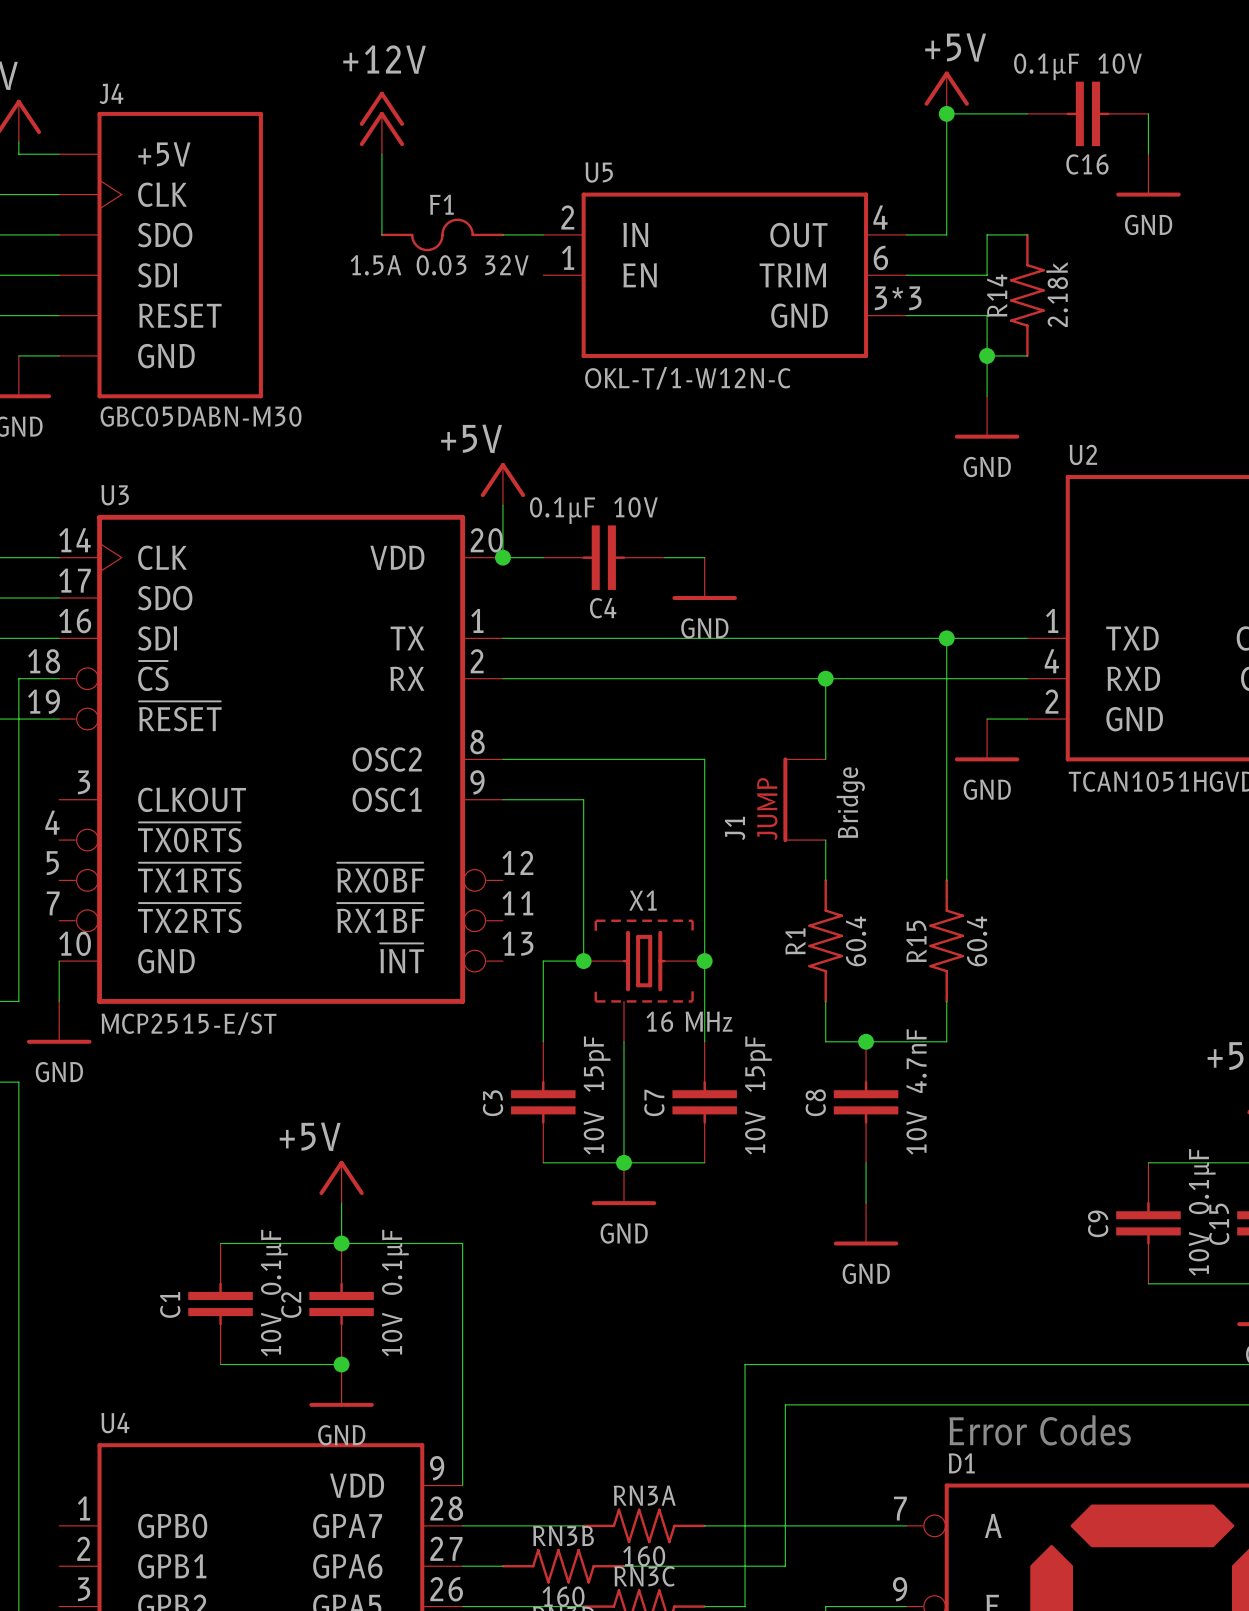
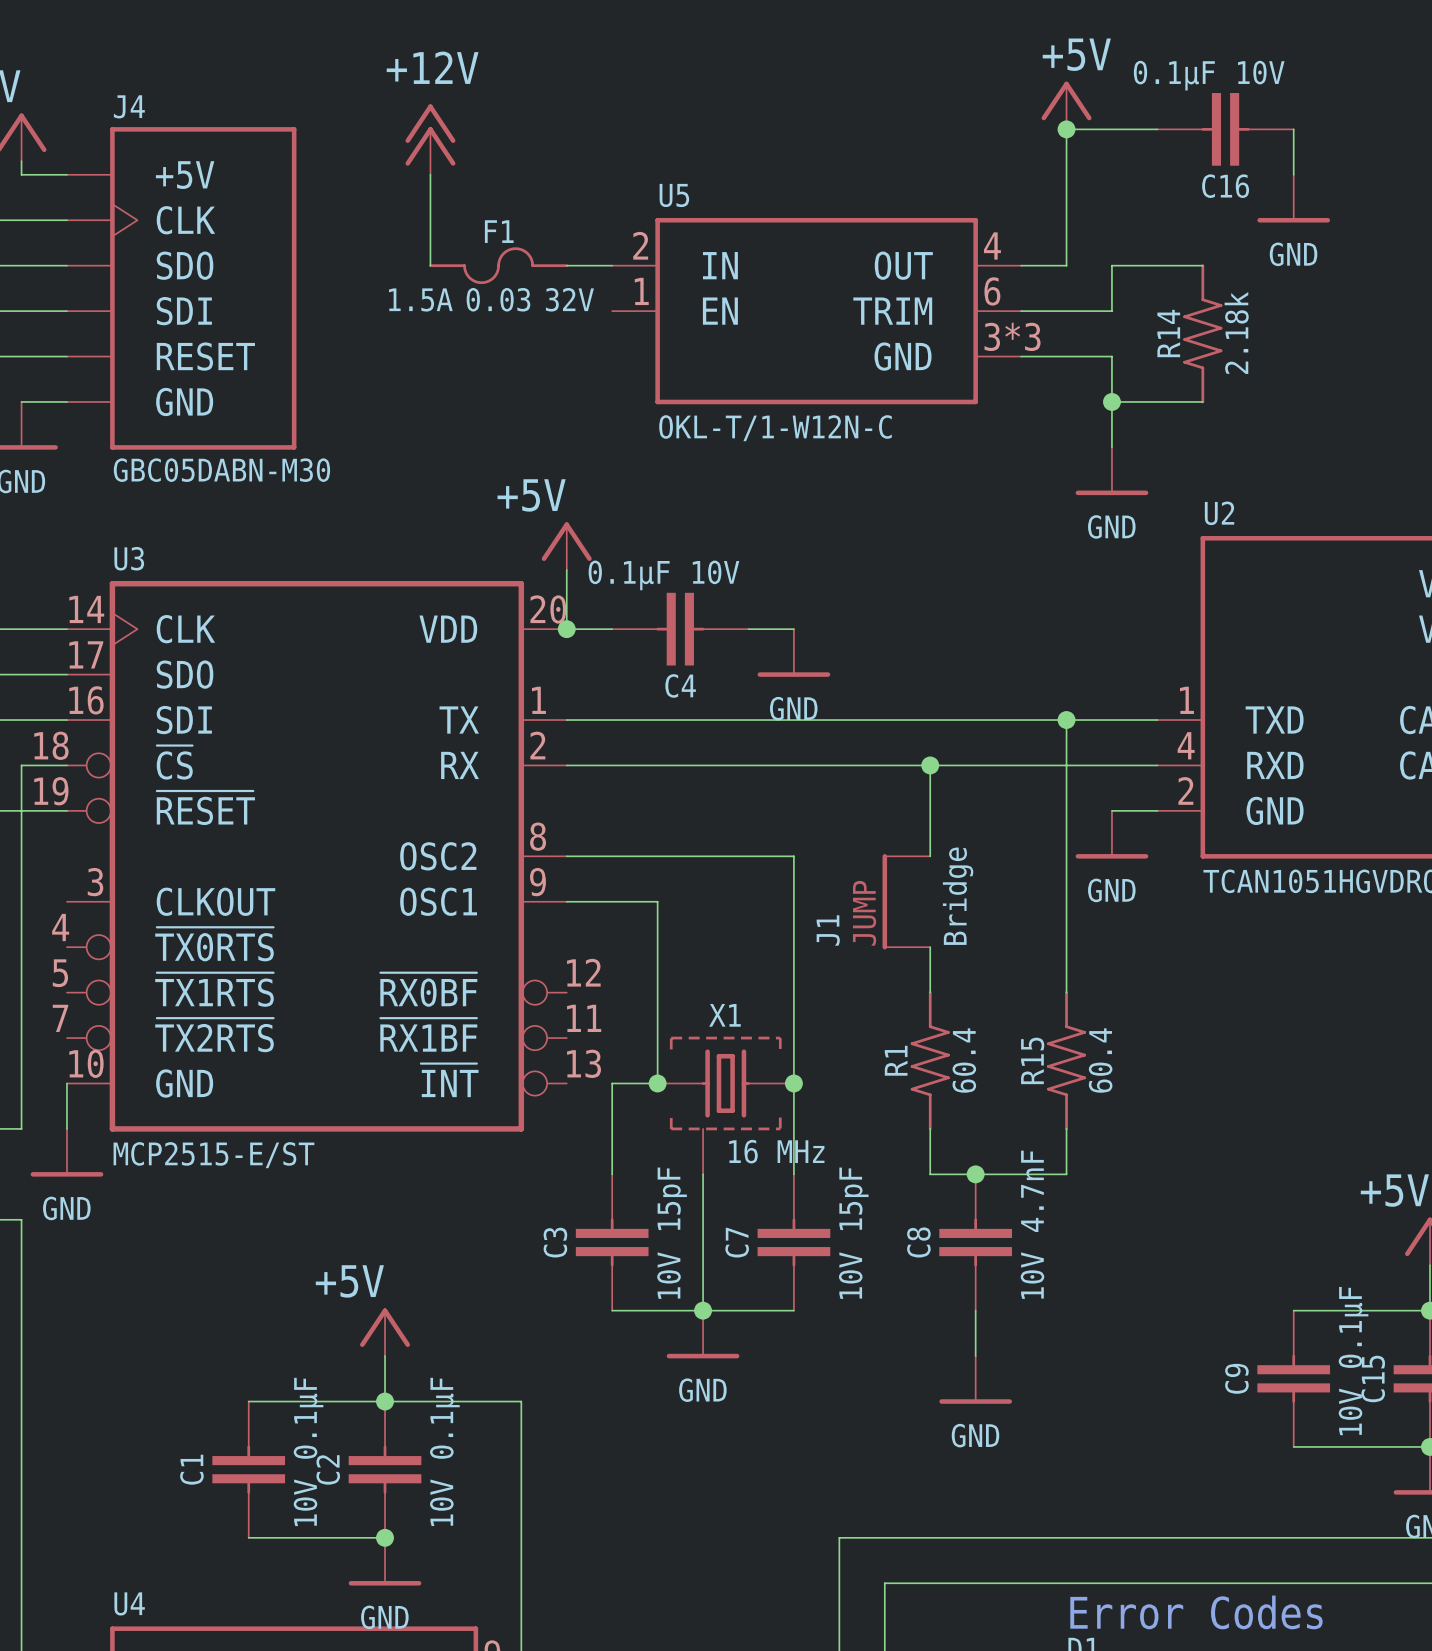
wire: none -> (1157, 265) (1202, 265)
R14 position: (1027, 295) -> (1202, 333)
wire: none -> (1157, 401) (1202, 401)

